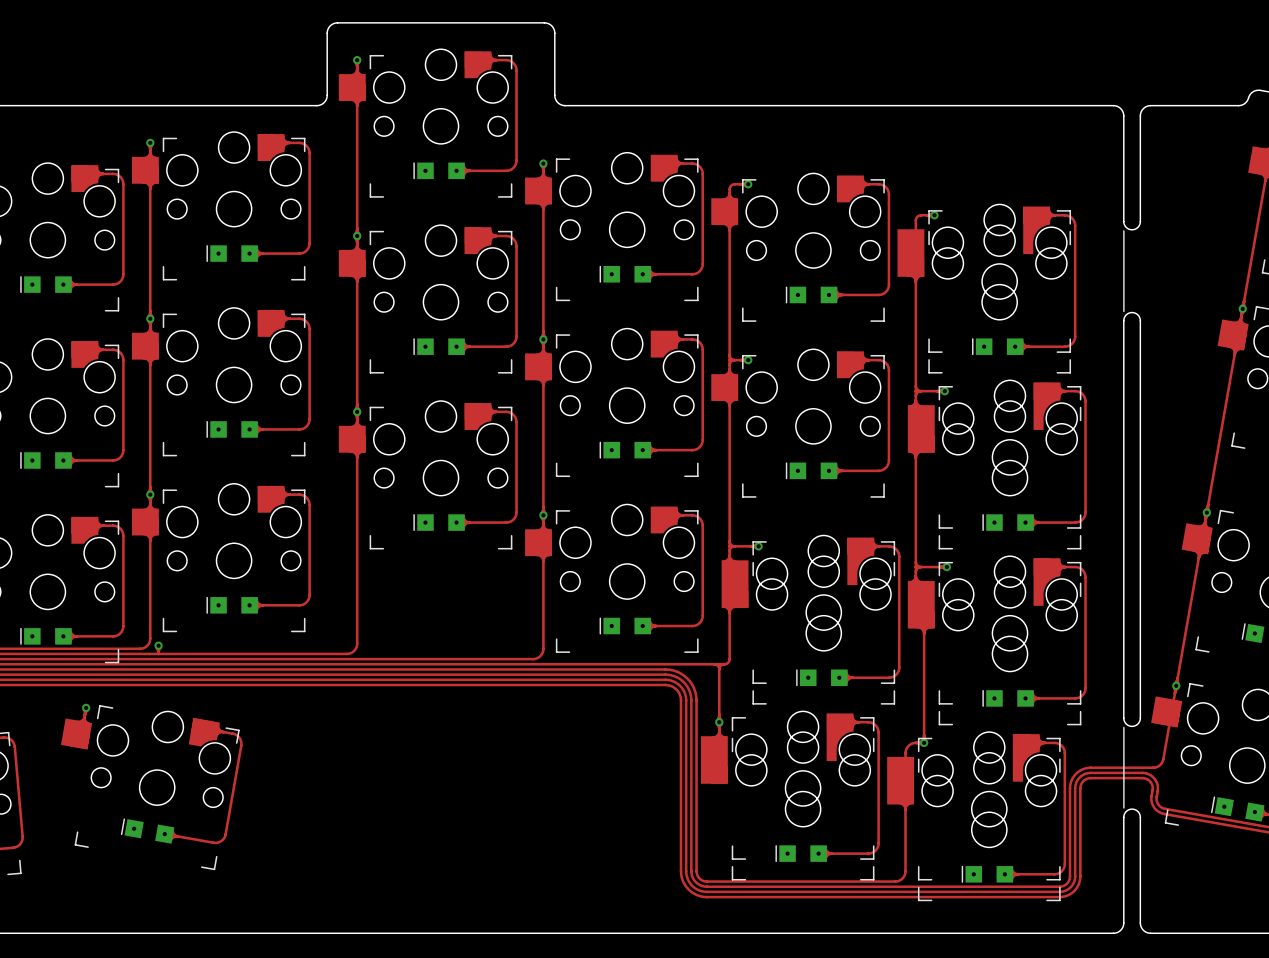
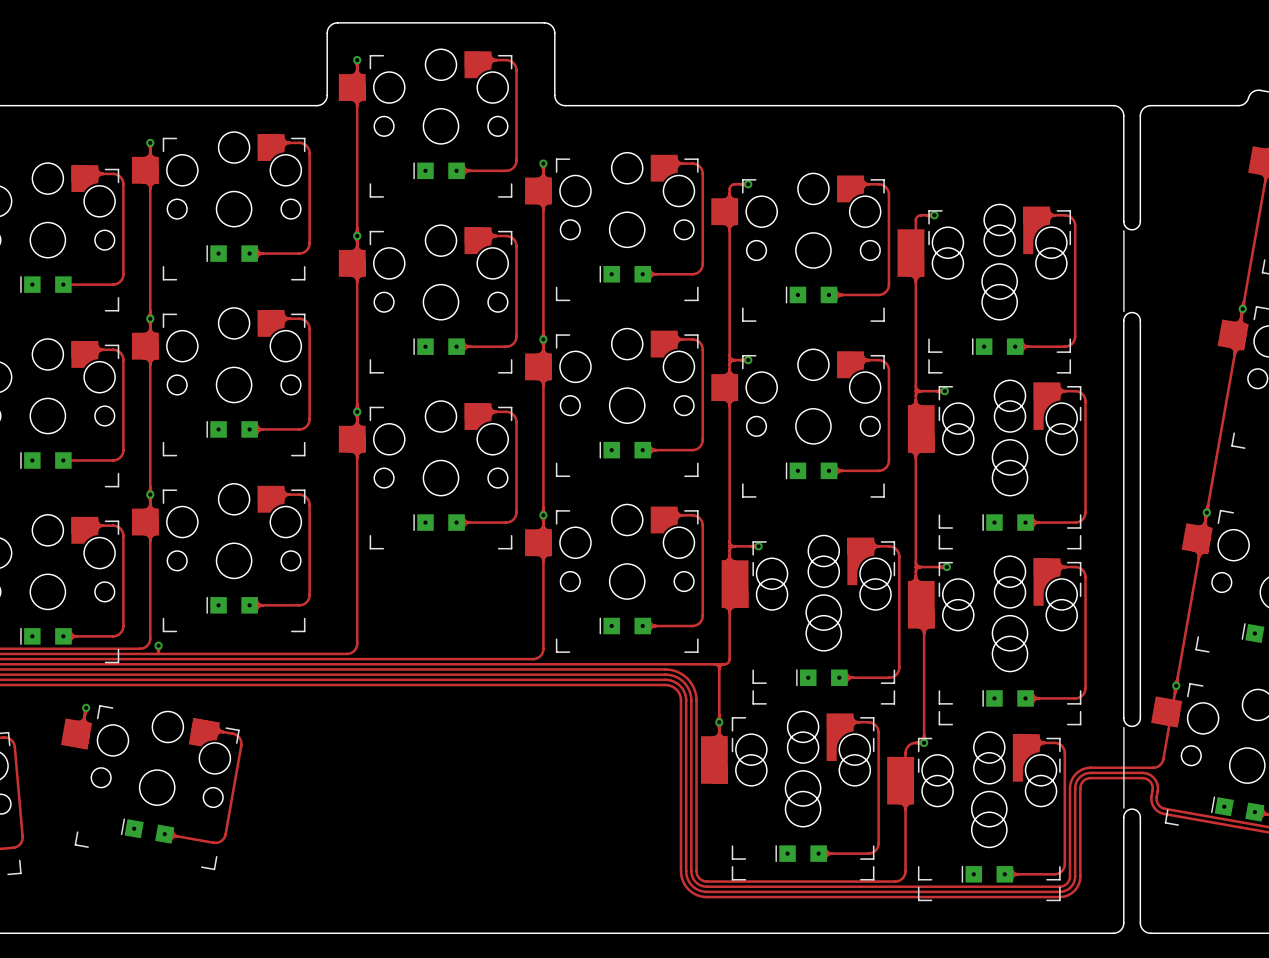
track: (70, 278) (72, 282) (76, 284) (72, 286) (70, 291) -> none
track: (70, 454) (72, 458) (76, 460) (72, 462) (70, 466) -> none

